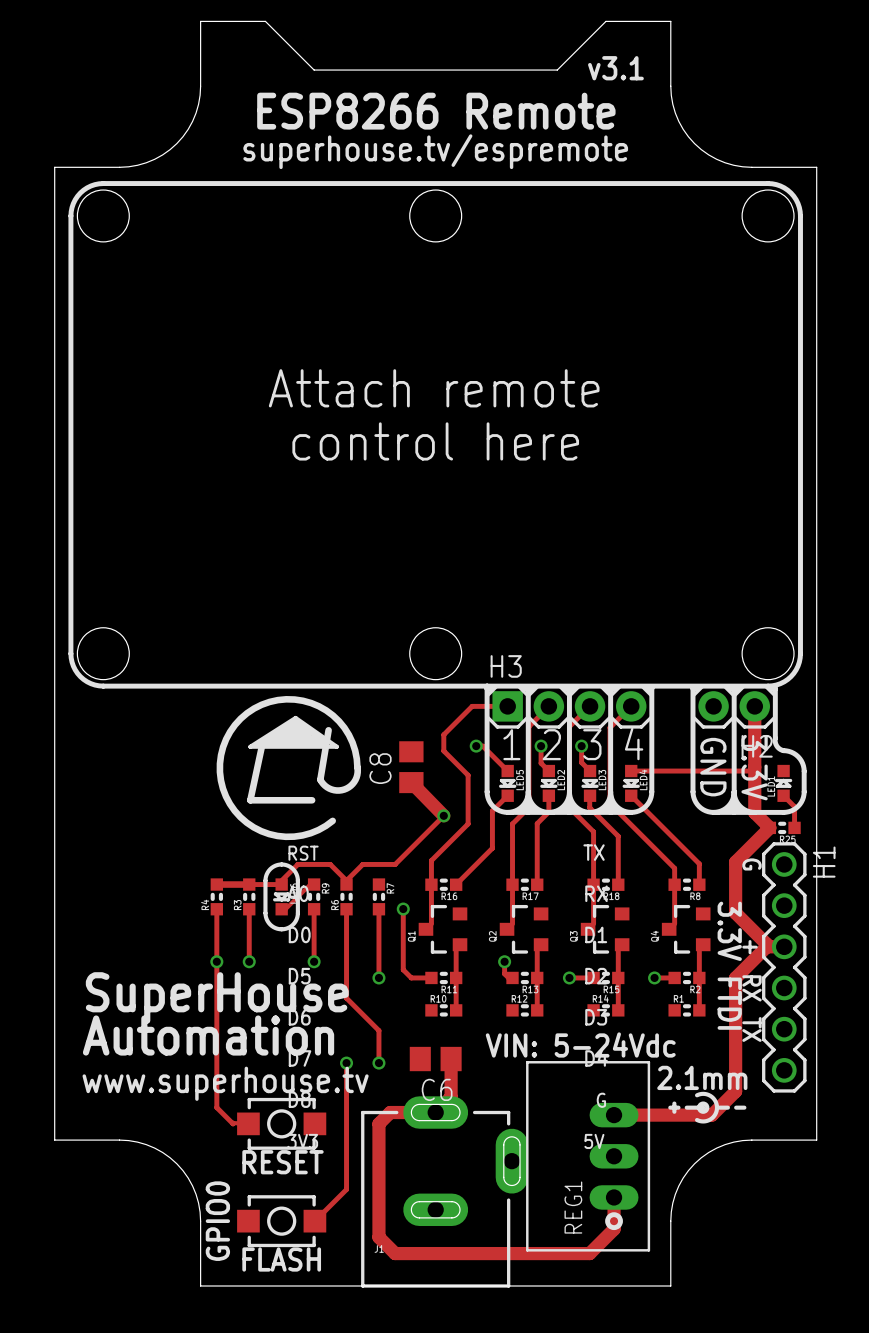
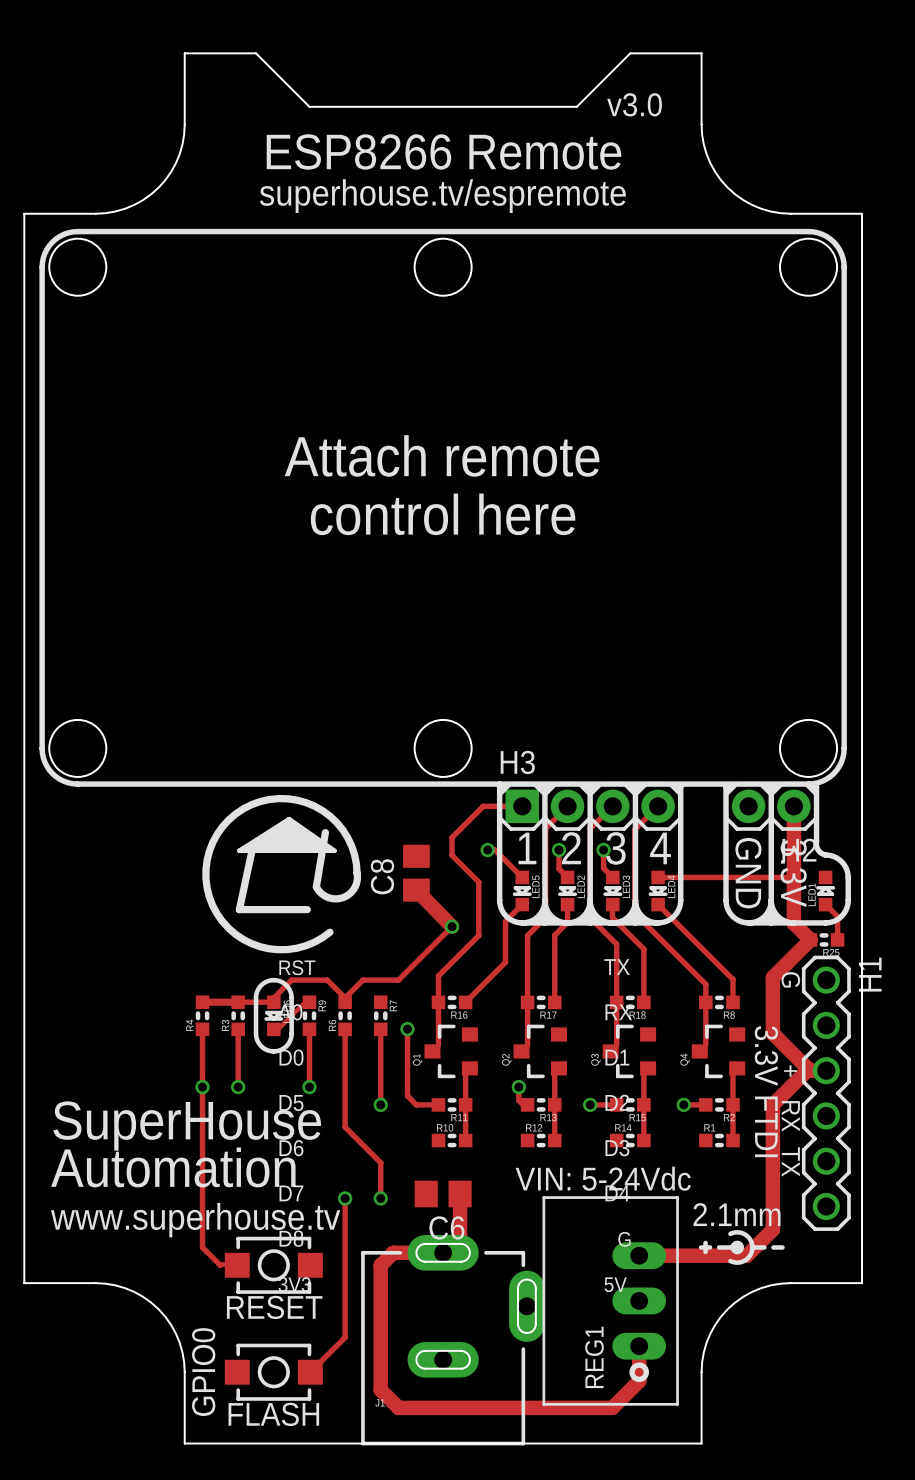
text: v3.1 (615, 68) -> v3.0 (634, 104)

